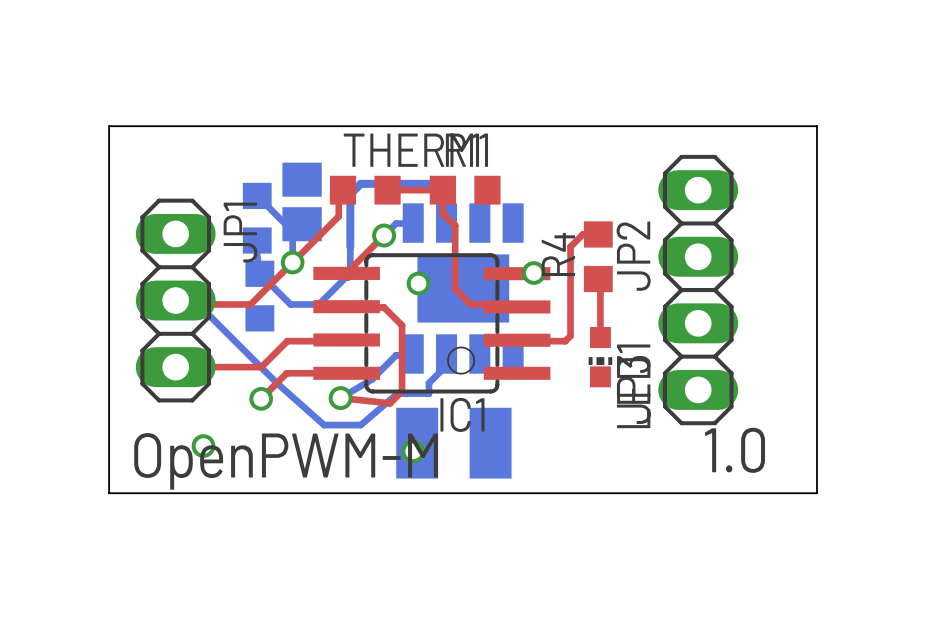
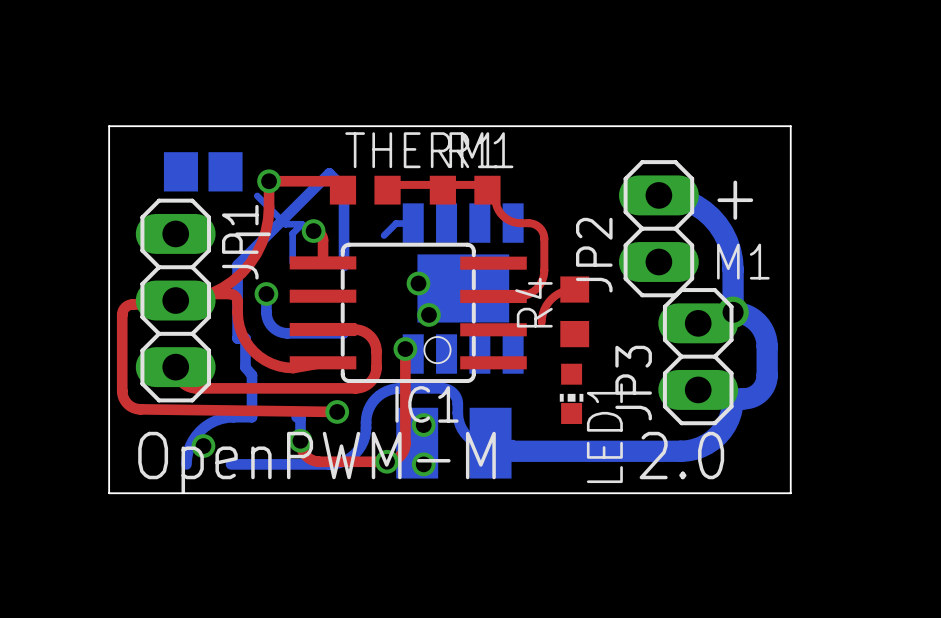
board edge: (790, 126) (816, 126) (816, 493) (790, 493) -> (790, 126) (790, 493)
via: none -> (269, 181)
top track: none -> (387, 184) (492, 184) (495, 182) (496, 204) (502, 215) (514, 222) (532, 223) (539, 227) (544, 236) (544, 270) (538, 286) (524, 295) (493, 296)
top track: (342, 190) (338, 194) (338, 216) (250, 304) (179, 304) (175, 300) -> (342, 184) (338, 181) (269, 181) (269, 207) (265, 231) (261, 242) (249, 264) (232, 281) (222, 288) (199, 297) (175, 300)
top track: (387, 190) (442, 190) (442, 213) (455, 225) (455, 288) (470, 304) (514, 304) (517, 306) -> none
bottom track: none -> (658, 195) (678, 197) (695, 205) (717, 224) (727, 241) (732, 259) (733, 312) (746, 314) (757, 322) (762, 329) (766, 341) (767, 375) (764, 387) (752, 397) (733, 398) (731, 412) (726, 425) (717, 435) (706, 444) (694, 449) (680, 451) (512, 451) (512, 443) (486, 445) (478, 443) (467, 436) (458, 421) (456, 398) (449, 390) (442, 388) (400, 388) (383, 392) (373, 401) (367, 413) (365, 432) (361, 446) (351, 456) (343, 461) (329, 464) (231, 464)
text: none -> + (735, 200)
part rotation: 0° (302, 201) -> 90° clockwise (203, 171)
part position: (302, 201) -> (203, 171)
part: (257, 218) -> none
bottom track: (446, 223) (444, 221) (444, 189) (439, 183) (360, 183) (350, 194) (350, 273) (318, 304) (290, 304) (259, 273) (254, 237) (257, 240) -> none
JP2 position: (698, 223) -> (658, 228)
text: none -> - (252, 234)
top track: none -> (313, 231) (319, 233) (322, 238) (323, 262)
via: none -> (313, 231)
top track: (598, 234) (582, 234) (570, 246) (570, 335) (565, 341) (517, 340) -> none
top track: (384, 235) (354, 265) (354, 271) (348, 277) (346, 273) -> none
via: (384, 235) -> none
R4 position: (598, 256) -> (574, 311)
text: none -> M1 (743, 261)
via: (292, 262) -> none
bottom track: none -> (344, 265) (344, 188) (329, 173) (237, 265) (237, 338) (245, 338) (245, 367) (252, 375) (252, 417) (221, 418) (204, 426) (192, 440) (188, 452) (186, 464)
via: (533, 273) -> none
top track: (598, 279) (600, 281) (600, 337) -> none
top track: none -> (574, 289) (562, 292) (551, 299) (544, 309) (541, 322)
bottom track: none -> (266, 293) (267, 317) (270, 325) (276, 330) (287, 333) (344, 332)
via: none -> (266, 293)
part: (259, 296) -> none
top track: none -> (175, 300) (177, 295) (181, 294) (232, 294) (237, 299) (238, 319) (241, 333) (249, 346) (259, 356) (271, 363) (286, 367) (323, 362)
top track: none -> (175, 300) (172, 304) (131, 304) (123, 310) (122, 393) (129, 405) (140, 409) (337, 411)
bottom track: (175, 300) (179, 304) (198, 304) (276, 383) -> none
top track: (346, 306) (384, 307) (402, 325) (402, 391) (390, 403) (340, 398) -> none
via: none -> (733, 312)
via: none -> (428, 314)
IC1 position: (431, 323) -> (408, 312)
top track: (346, 339) (287, 341) (261, 367) (175, 367) -> (323, 329) (357, 329) (365, 332) (371, 338) (376, 348) (376, 370) (373, 377) (368, 384) (355, 388) (194, 388) (186, 385) (180, 380) (175, 367)
top track: none -> (405, 349) (405, 445) (398, 457) (387, 461) (316, 461) (309, 458) (303, 453) (300, 440)
via: none -> (405, 349)
bottom track: (413, 354) (396, 355) (372, 379) (340, 398) -> none
bottom track: (446, 354) (446, 365) (428, 383) (428, 393) (397, 393) (360, 425) (324, 425) (276, 383) -> none
LED1 position: (600, 357) -> (571, 393)
top track: (346, 373) (286, 373) (261, 398) -> none
via: (261, 398) -> none
via position: (340, 398) -> (337, 411)
bottom track: none -> (296, 417) (300, 418) (300, 440)
via: none -> (423, 425)
via: none -> (300, 440)
text: 1.0 (734, 450) -> 2.0 (681, 455)
via position: (413, 451) -> (423, 464)
via: none -> (387, 461)

